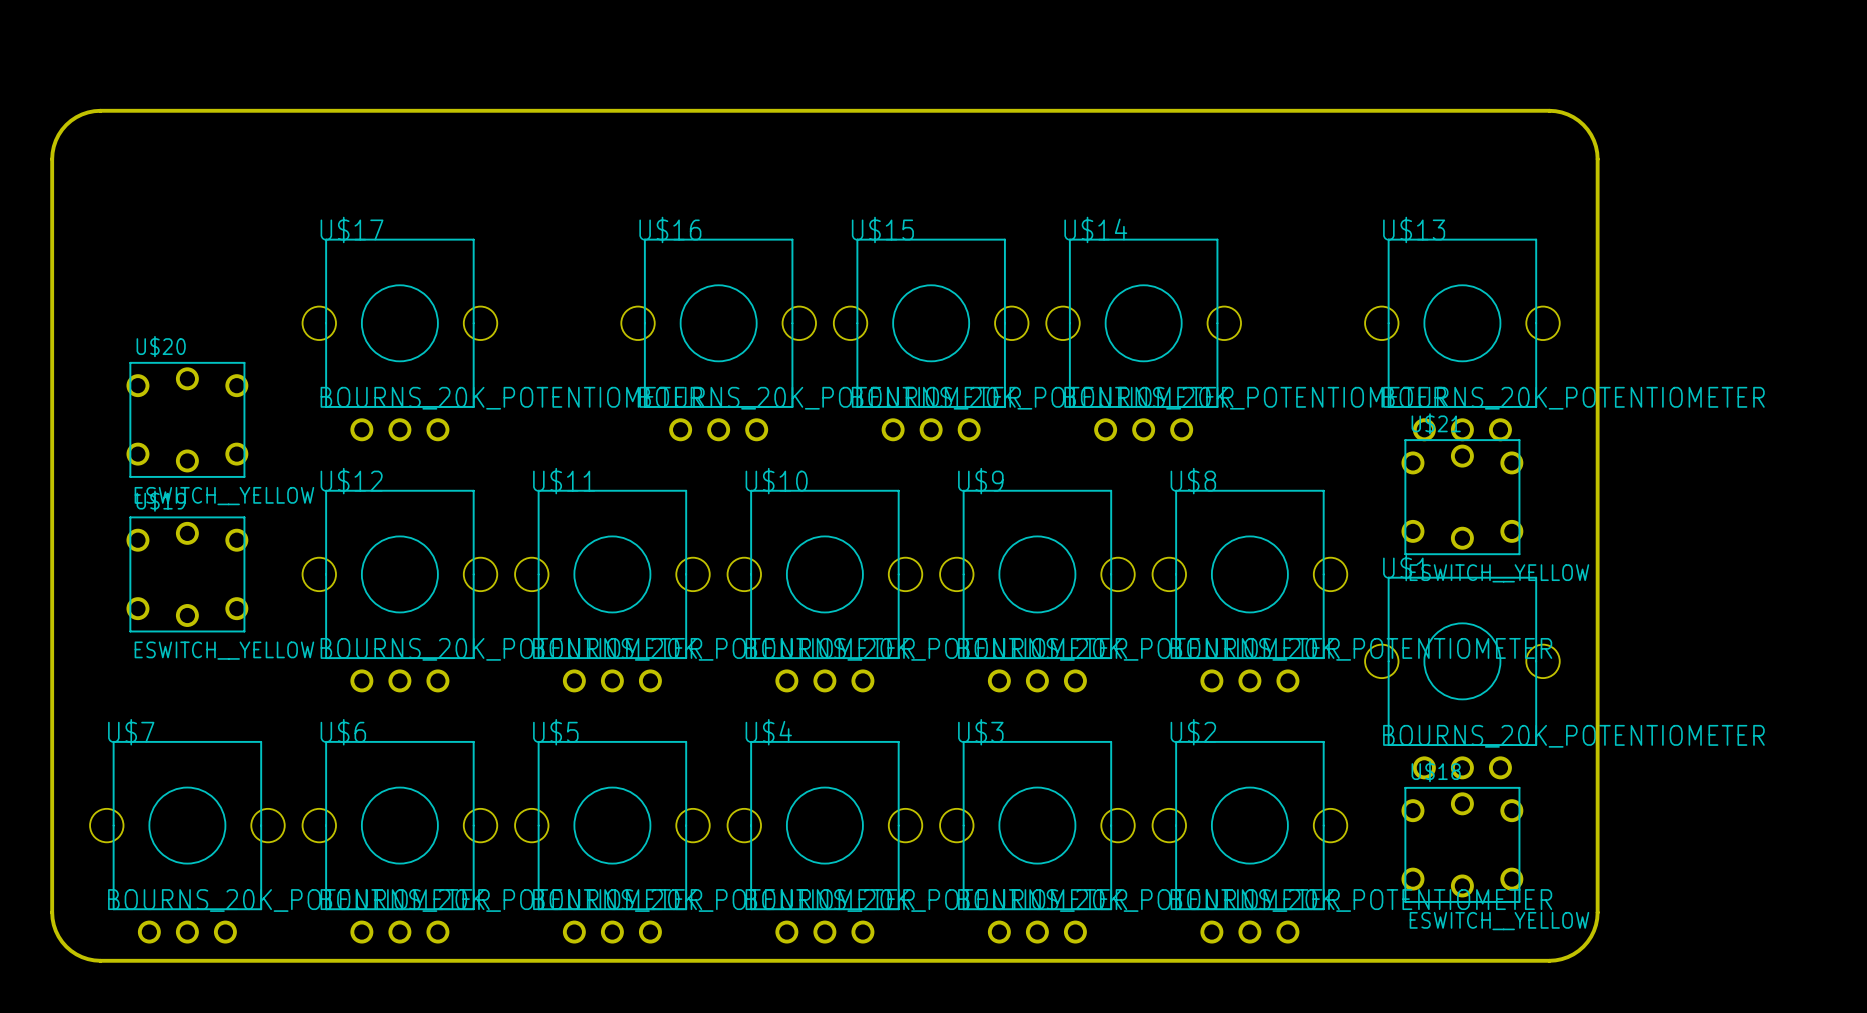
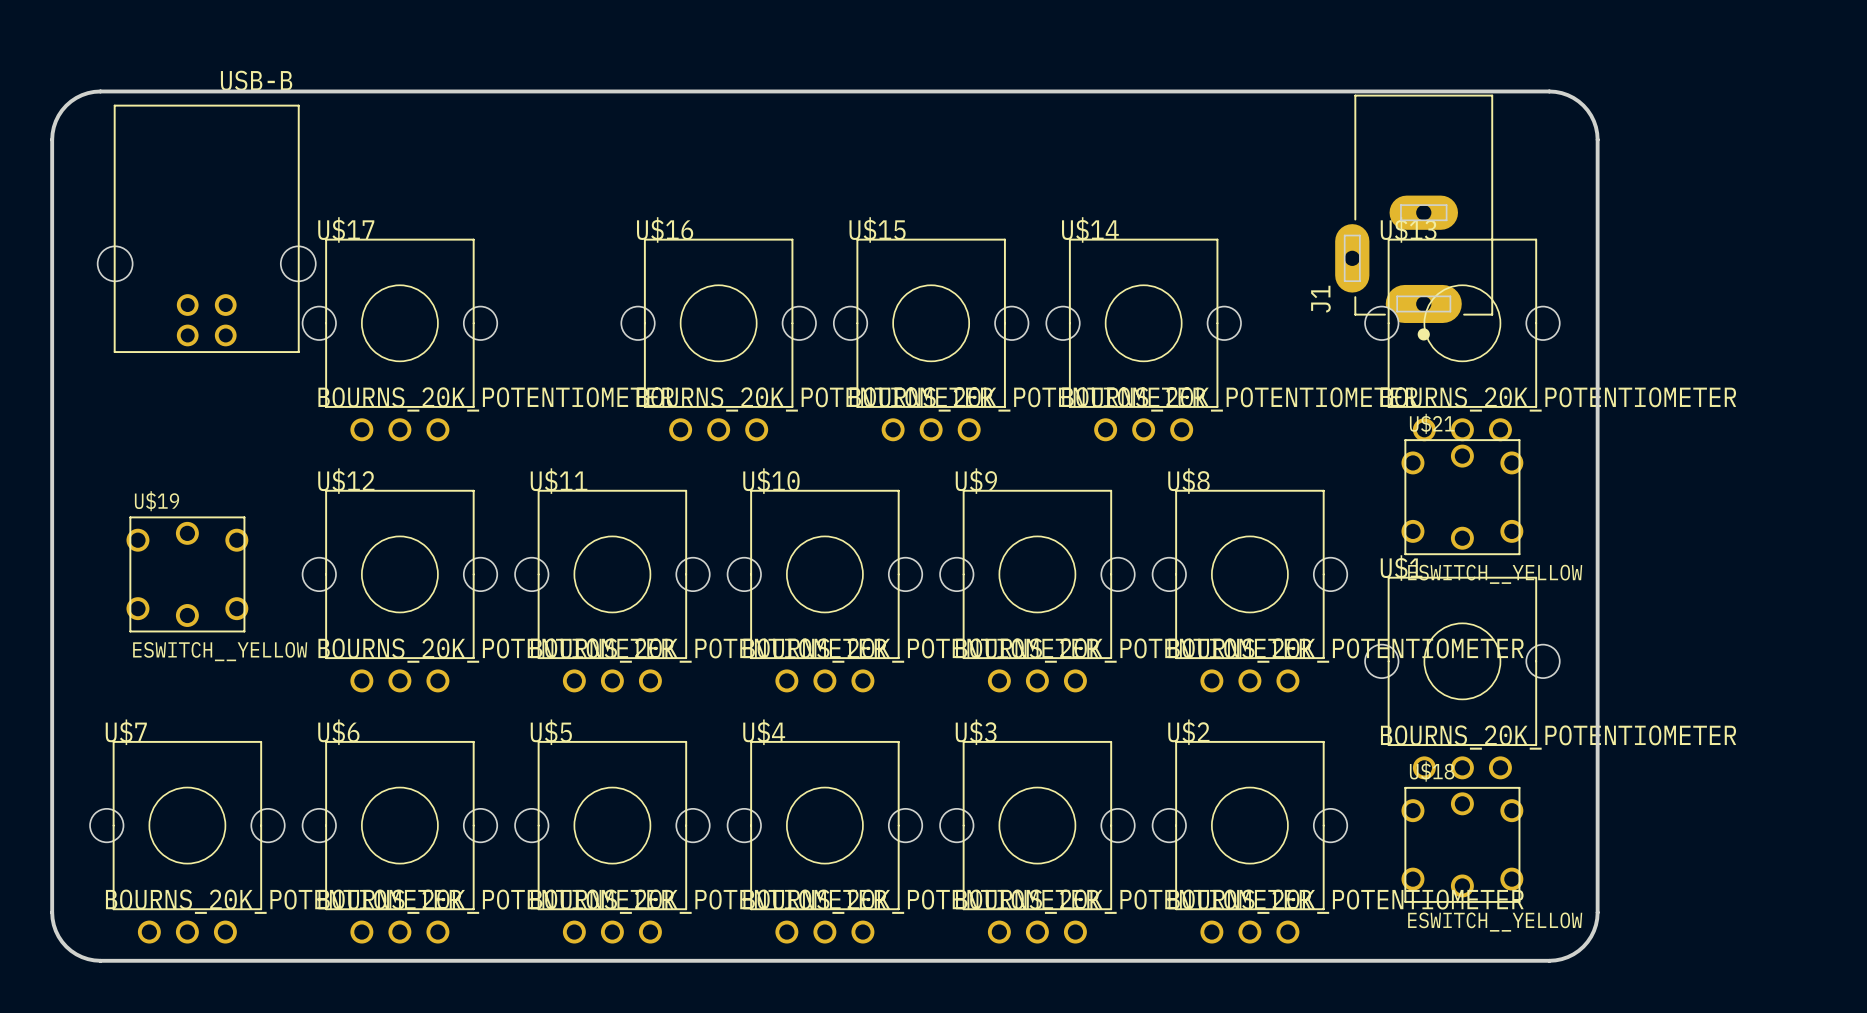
board edge: (52, 159) (55, 140) (66, 124) (81, 114) (100, 110) (1549, 110) (1567, 114) (1583, 124) (1593, 140) (1597, 159) -> (52, 159) (53, 127) (62, 110) (71, 101) (81, 95) (100, 91) (1549, 91) (1567, 95) (1578, 101) (1587, 110) (1595, 127) (1597, 159)
J1: none -> (1414, 217)
part: none -> USB-B (206, 228)
U$20: ESWITCH__YELLOW (187, 419) -> none

